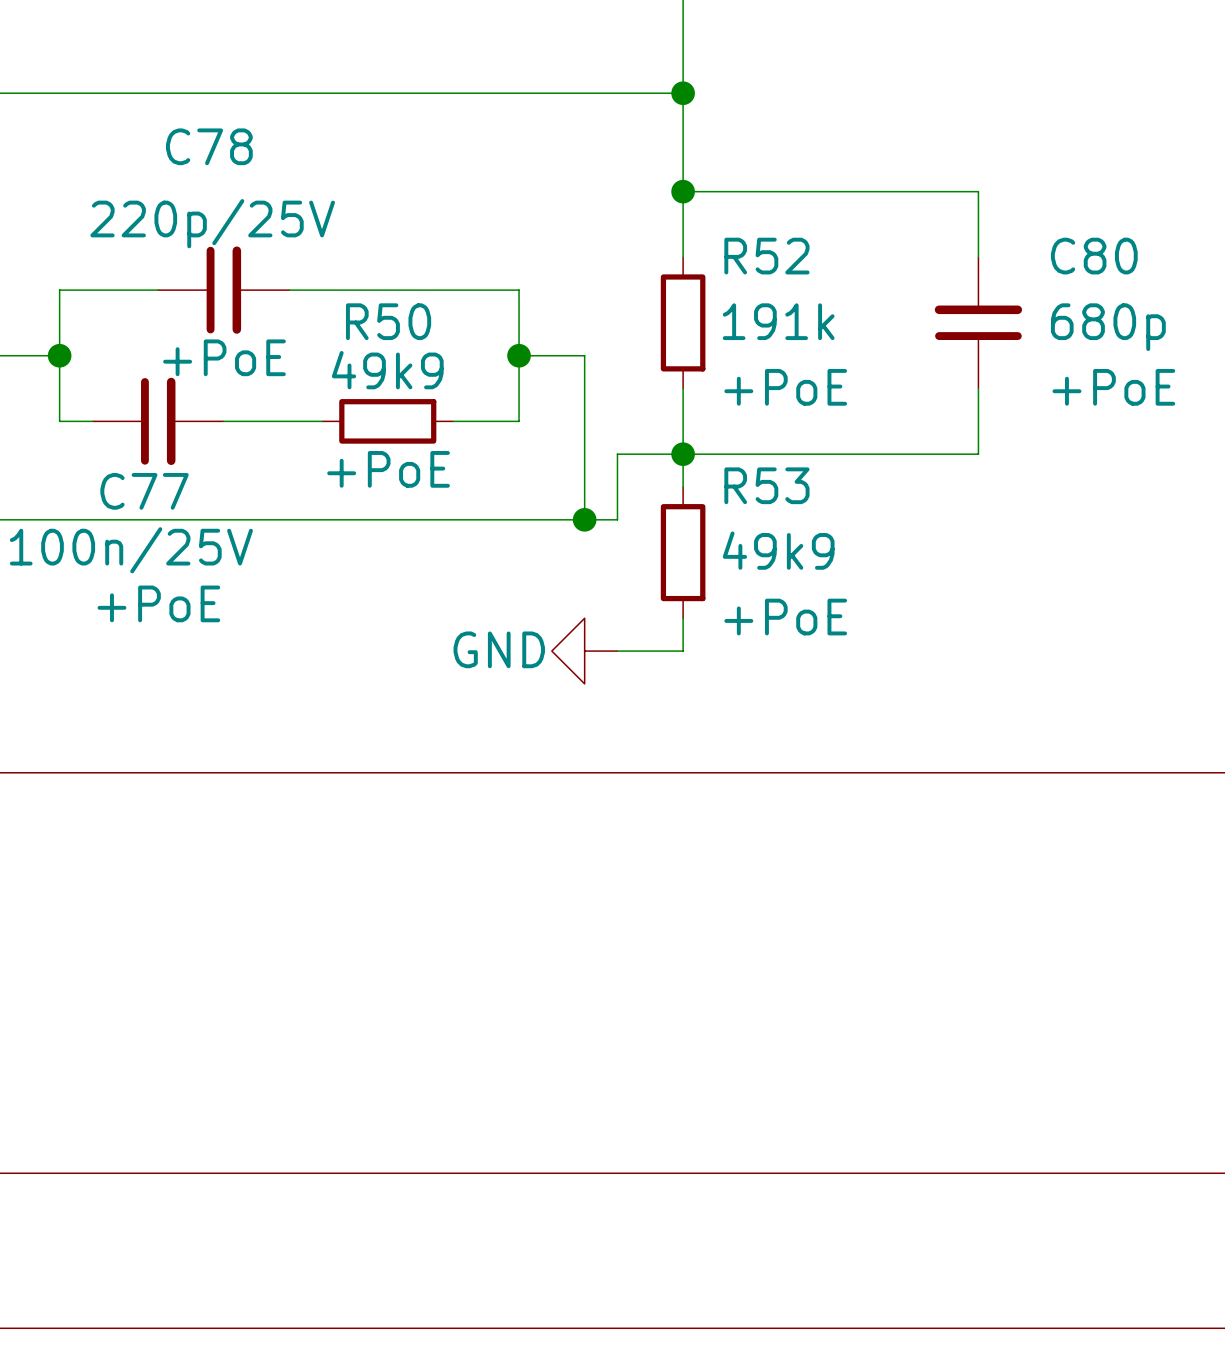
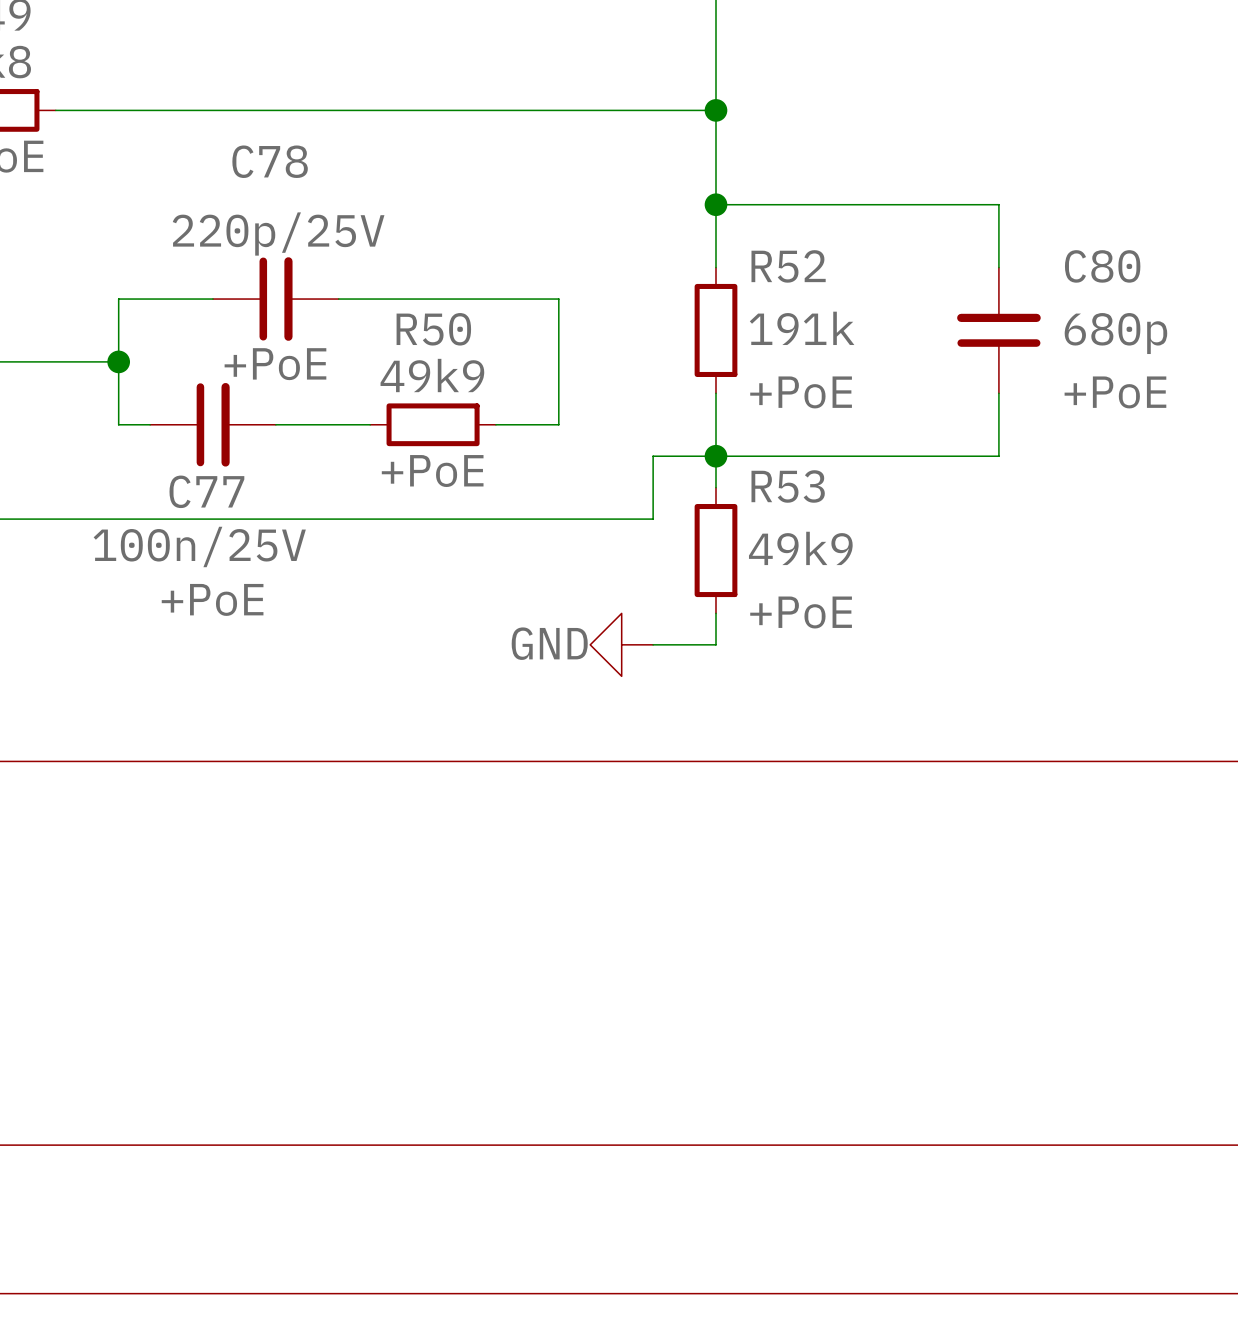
wire: (519, 355) (584, 355) (584, 519) -> none
junction: (519, 355) -> none
junction: (584, 519) -> none

